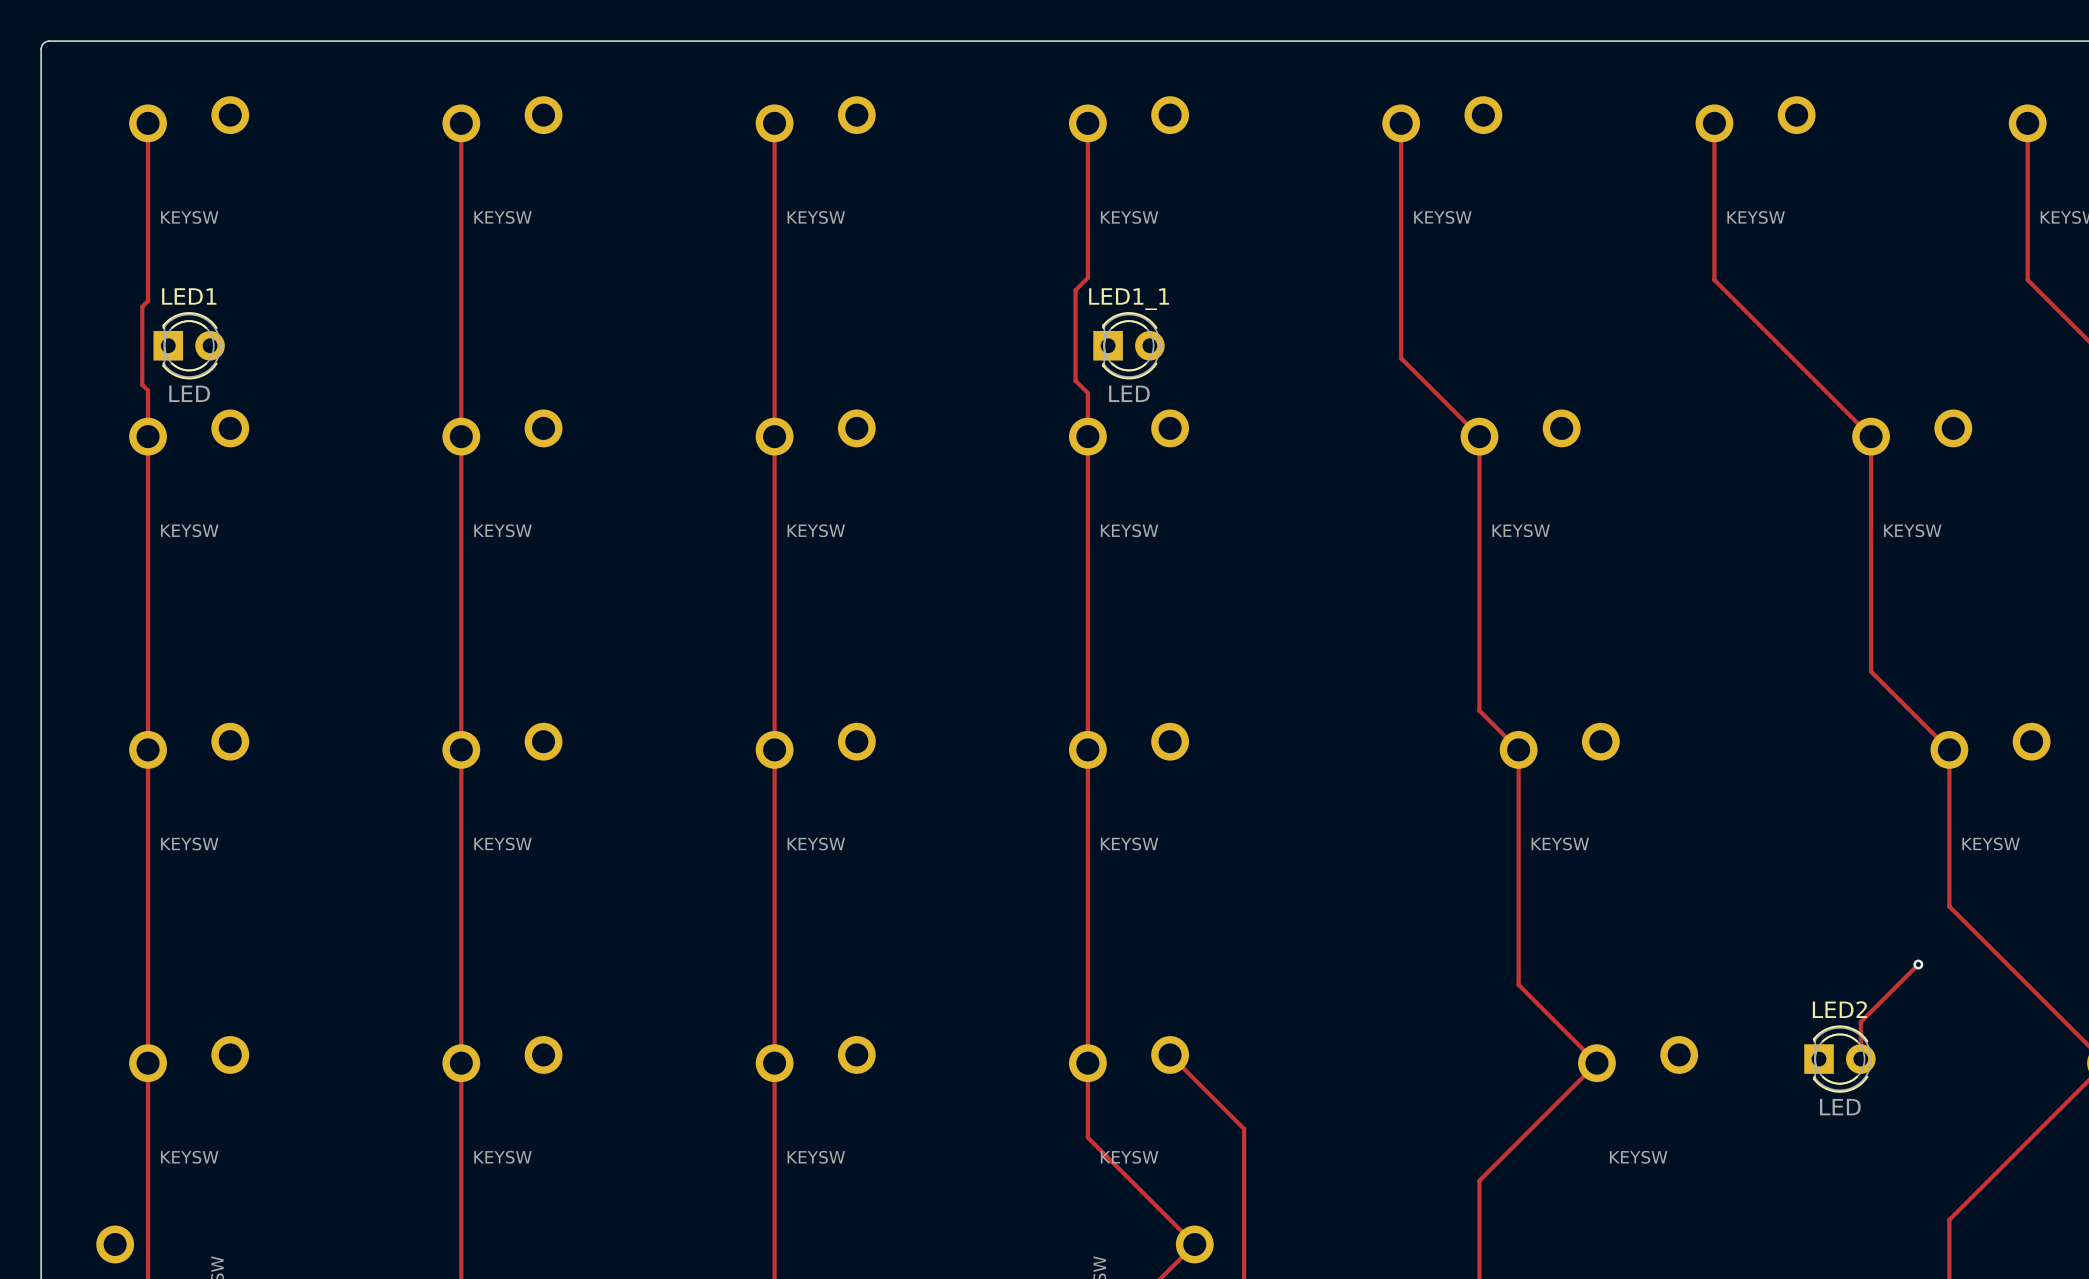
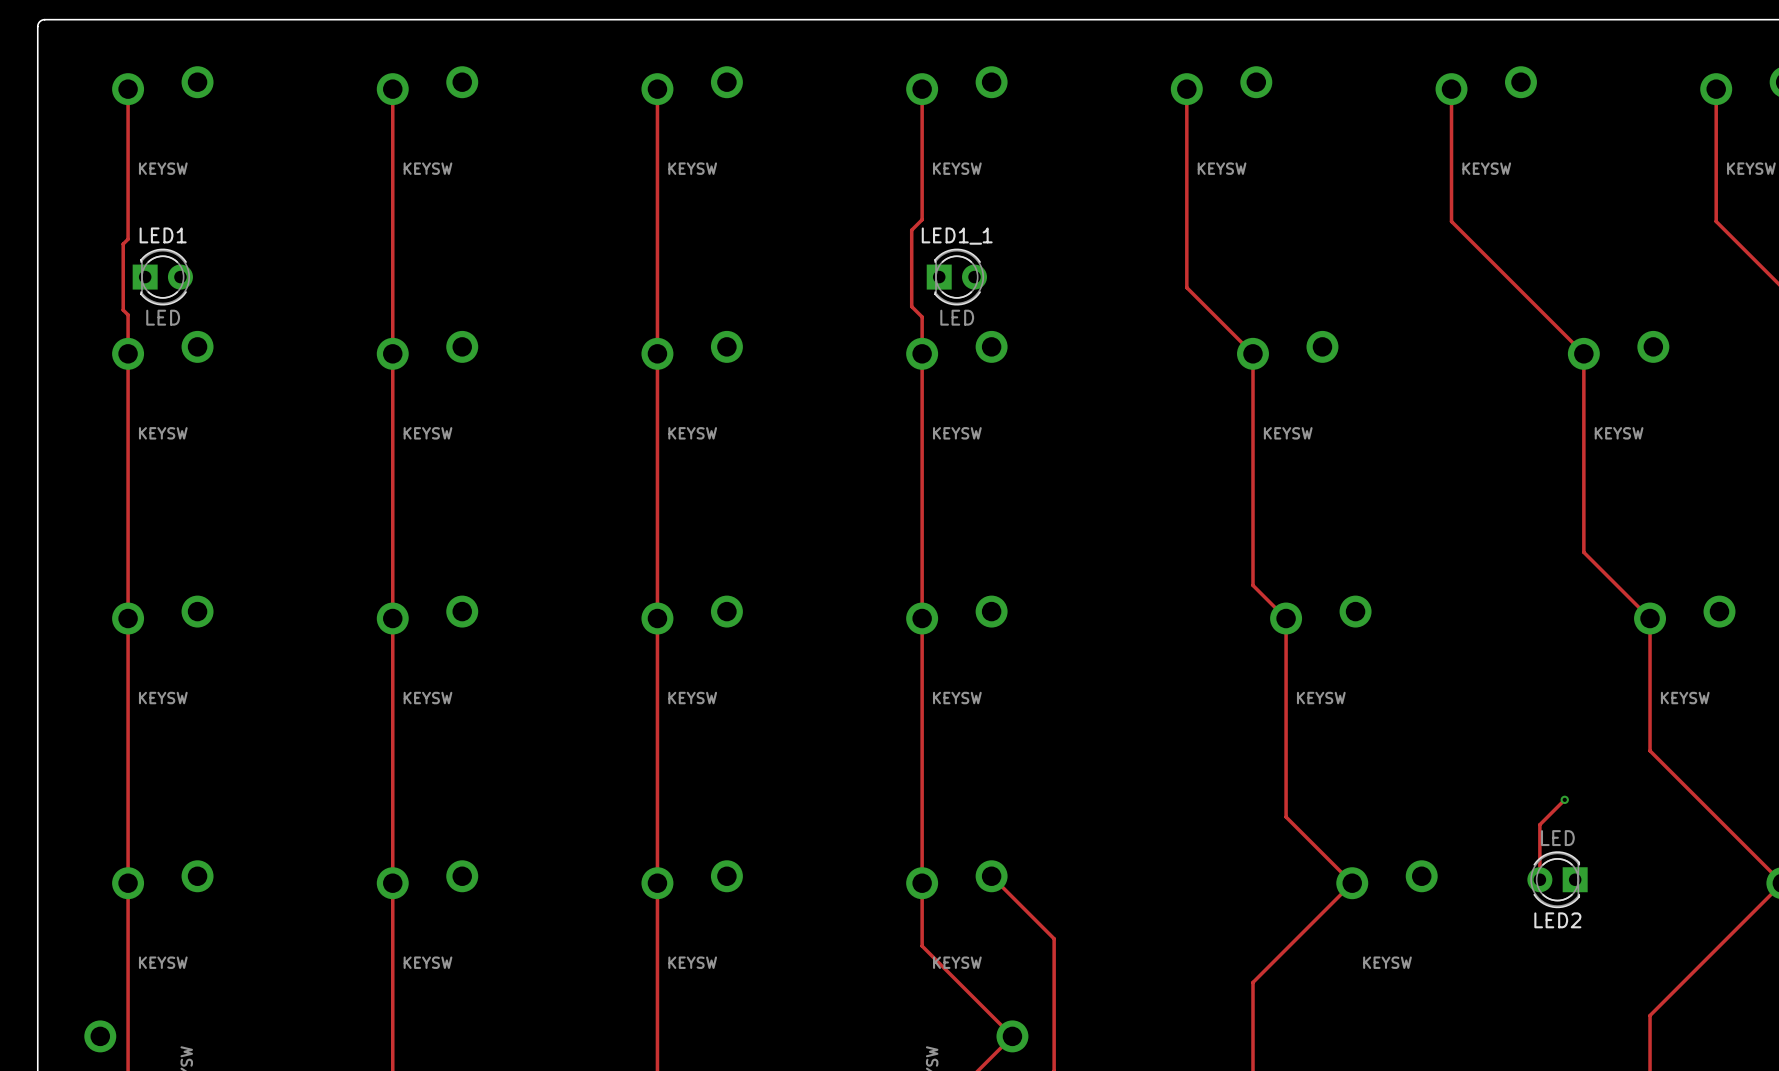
track: none -> (1564, 799) (1539, 824) (1539, 879)
track: (1918, 964) (1860, 1022) (1860, 1059) -> none
via position: (1918, 964) -> (1564, 799)
LED2 rotation: 0° (1839, 1059) -> 180° (1557, 879)

